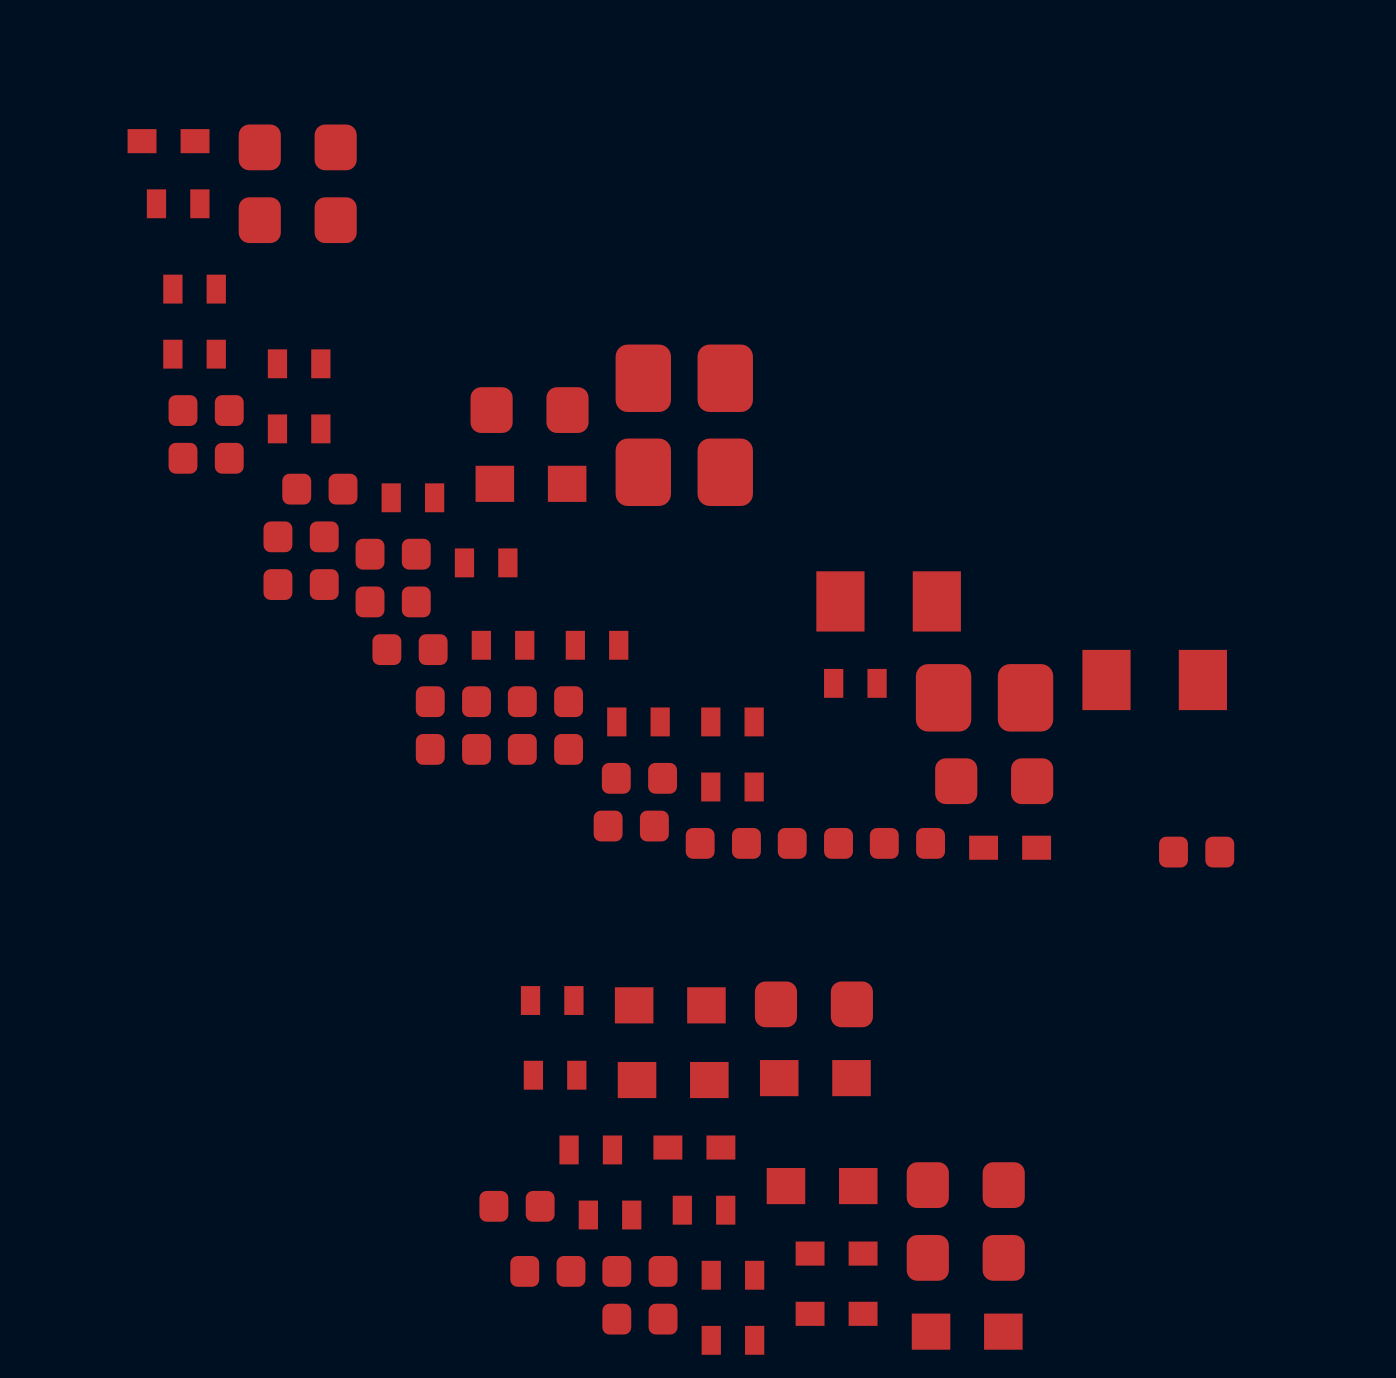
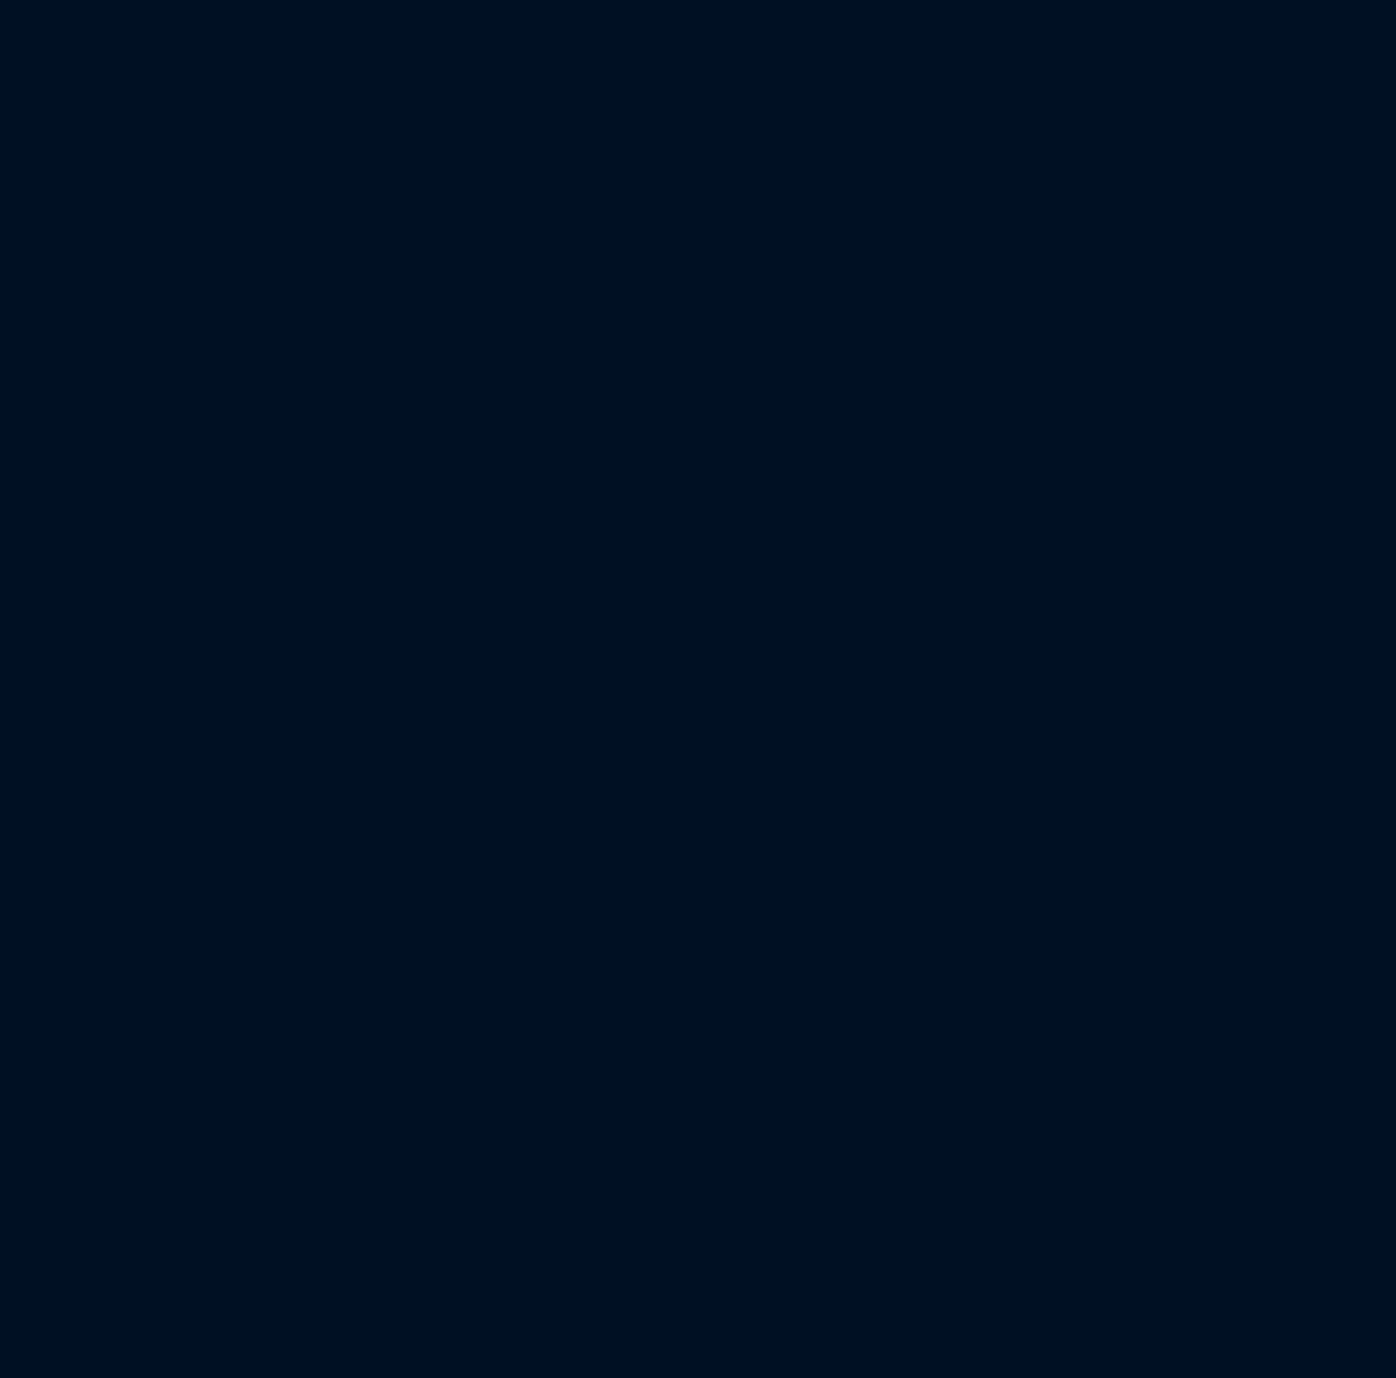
part: (168, 141) -> none
part: (297, 147) -> none
part: (178, 203) -> none
part: (297, 220) -> none
part: (194, 289) -> none
part: (194, 354) -> none
part: (299, 363) -> none
part: (684, 378) -> none
part: (206, 410) -> none
part: (529, 410) -> none
part: (299, 428) -> none
part: (206, 458) -> none
part: (684, 472) -> none
part: (530, 483) -> none
part: (319, 489) -> none
part: (412, 497) -> none
part: (301, 536) -> none
part: (393, 554) -> none
part: (486, 562) -> none
part: (301, 584) -> none
part: (393, 601) -> none
part: (888, 601) -> none
part: (503, 645) -> none
part: (597, 645) -> none
part: (410, 649) -> none
part: (1154, 679) -> none
part: (855, 683) -> none
part: (984, 697) -> none
part: (453, 701) -> none
part: (545, 701) -> none
part: (638, 721) -> none
part: (732, 721) -> none
part: (453, 749) -> none
part: (545, 749) -> none
part: (639, 778) -> none
part: (994, 781) -> none
part: (732, 787) -> none
part: (631, 826) -> none
part: (723, 843) -> none
part: (815, 843) -> none
part: (907, 843) -> none
part: (1010, 847) -> none
part: (1196, 852) -> none
part: (552, 1000) -> none
part: (813, 1004) -> none
part: (670, 1005) -> none
part: (555, 1075) -> none
part: (815, 1078) -> none
part: (673, 1080) -> none
part: (694, 1147) -> none
part: (590, 1149) -> none
part: (965, 1185) -> none
part: (822, 1186) -> none
part: (517, 1206) -> none
part: (704, 1210) -> none
part: (610, 1215) -> none
part: (836, 1253) -> none
part: (965, 1257) -> none
part: (547, 1271) -> none
part: (639, 1271) -> none
part: (732, 1275) -> none
part: (836, 1313) -> none
part: (639, 1319) -> none
part: (967, 1331) -> none
part: (732, 1340) -> none

